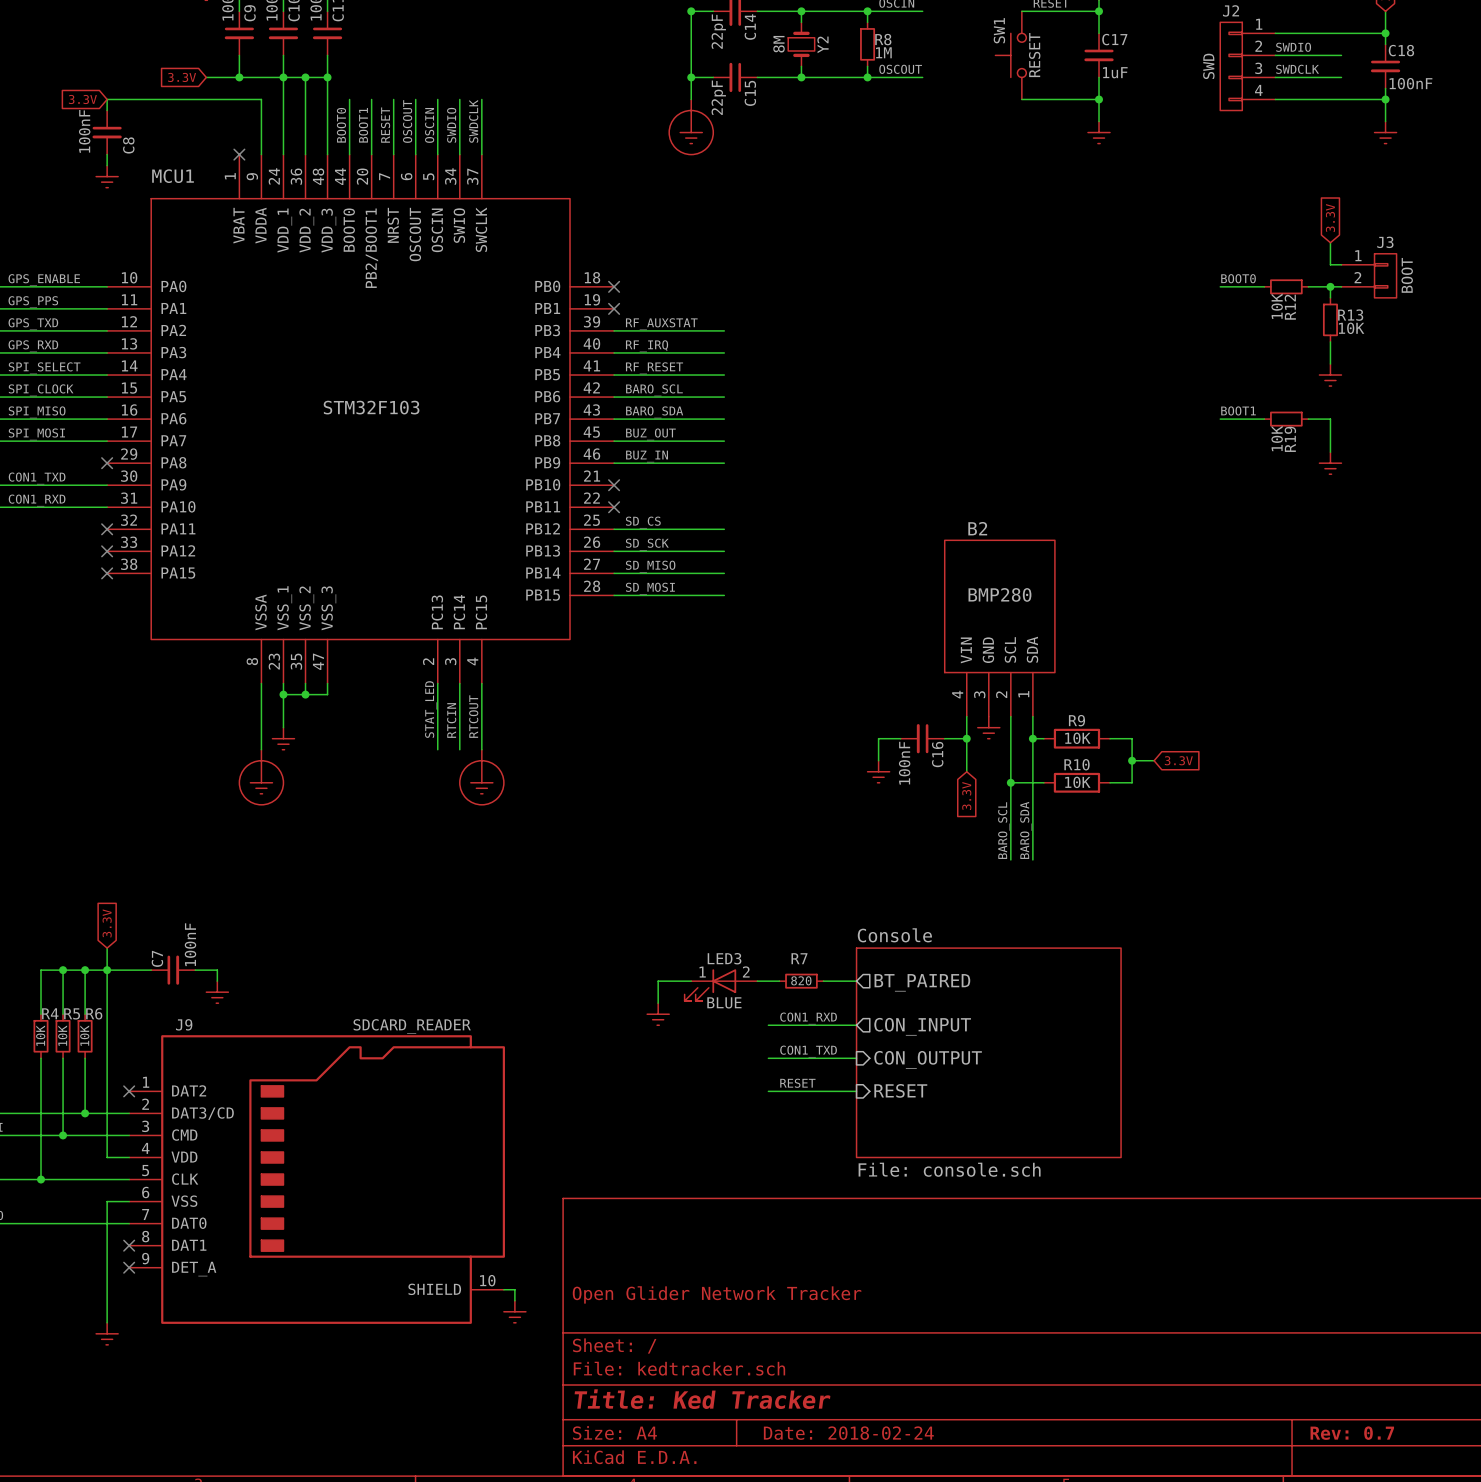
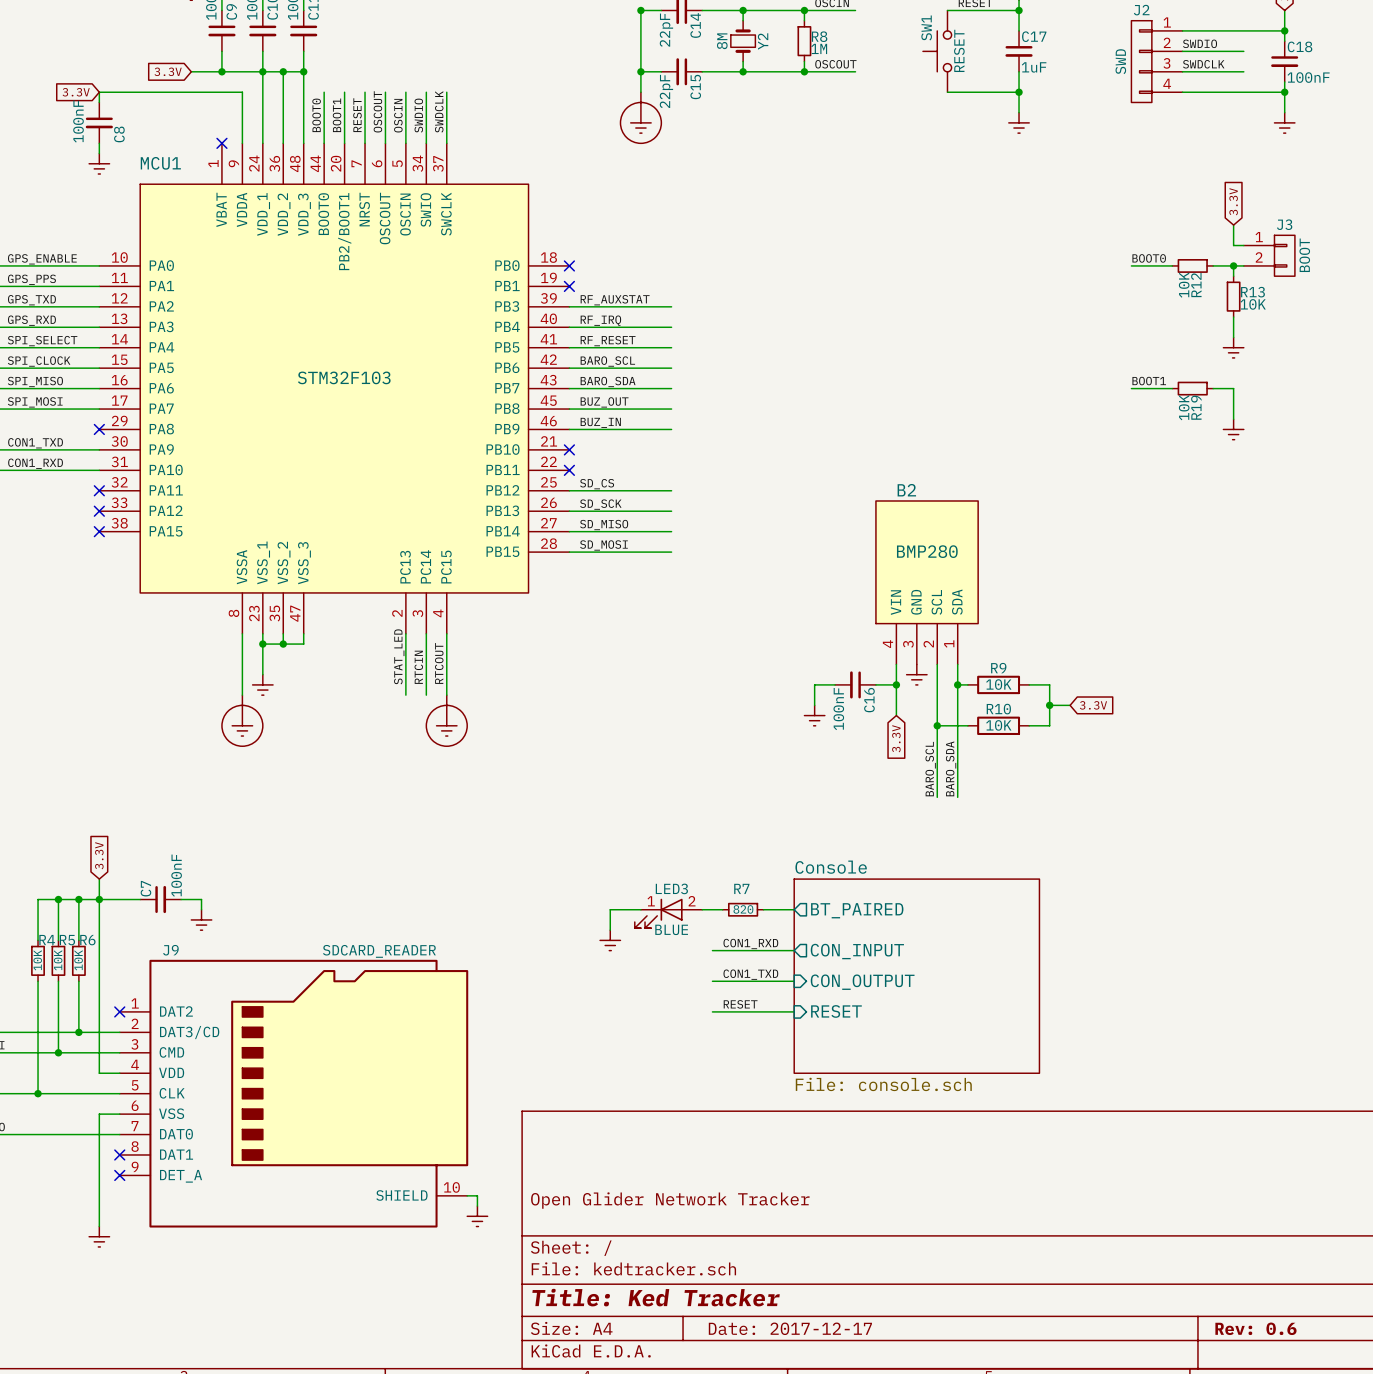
title block: Date: 2018-02-24 (848, 1433) -> Date: 2017-12-17 (790, 1328)
title block: Rev: 0.7 (1352, 1433) -> Rev: 0.6 (1255, 1328)

